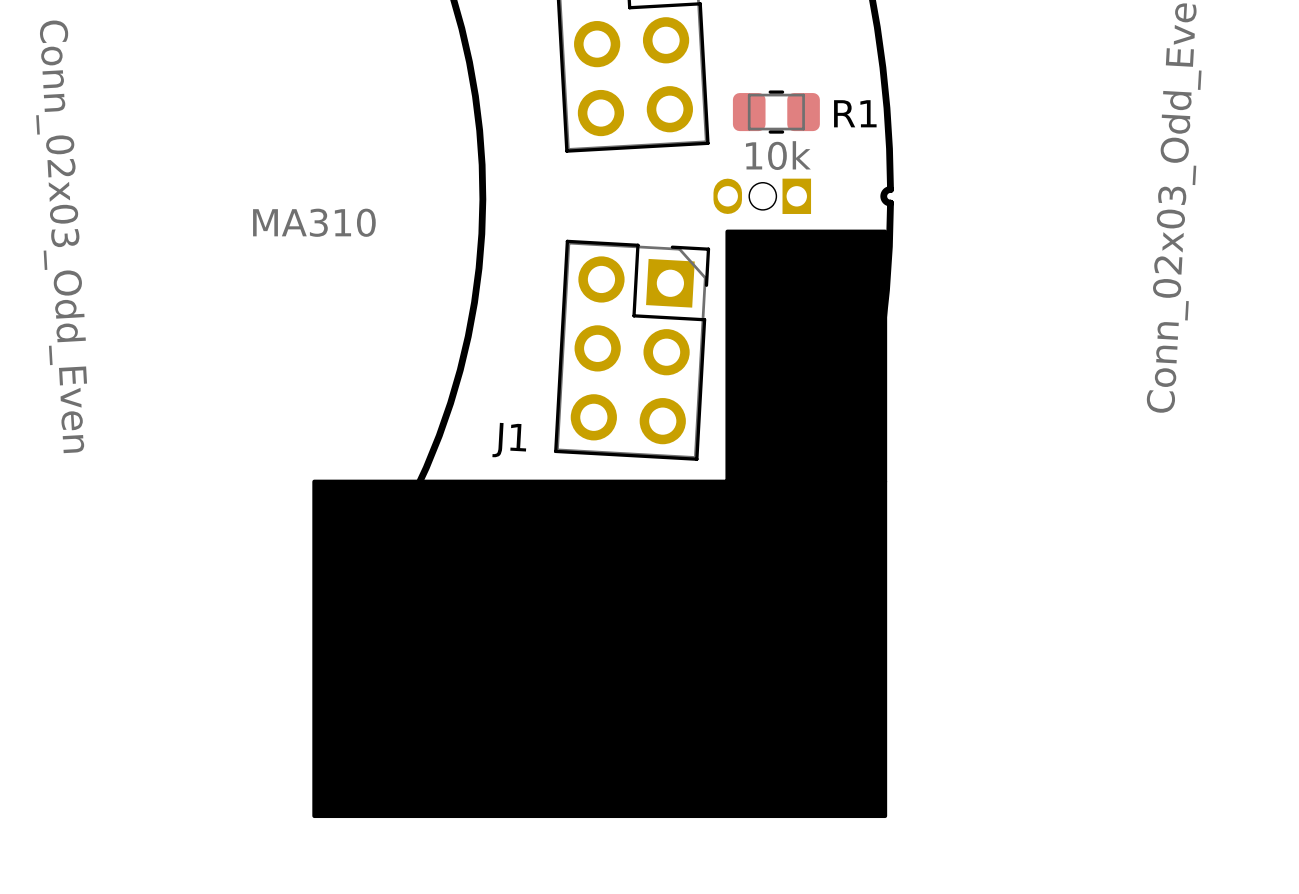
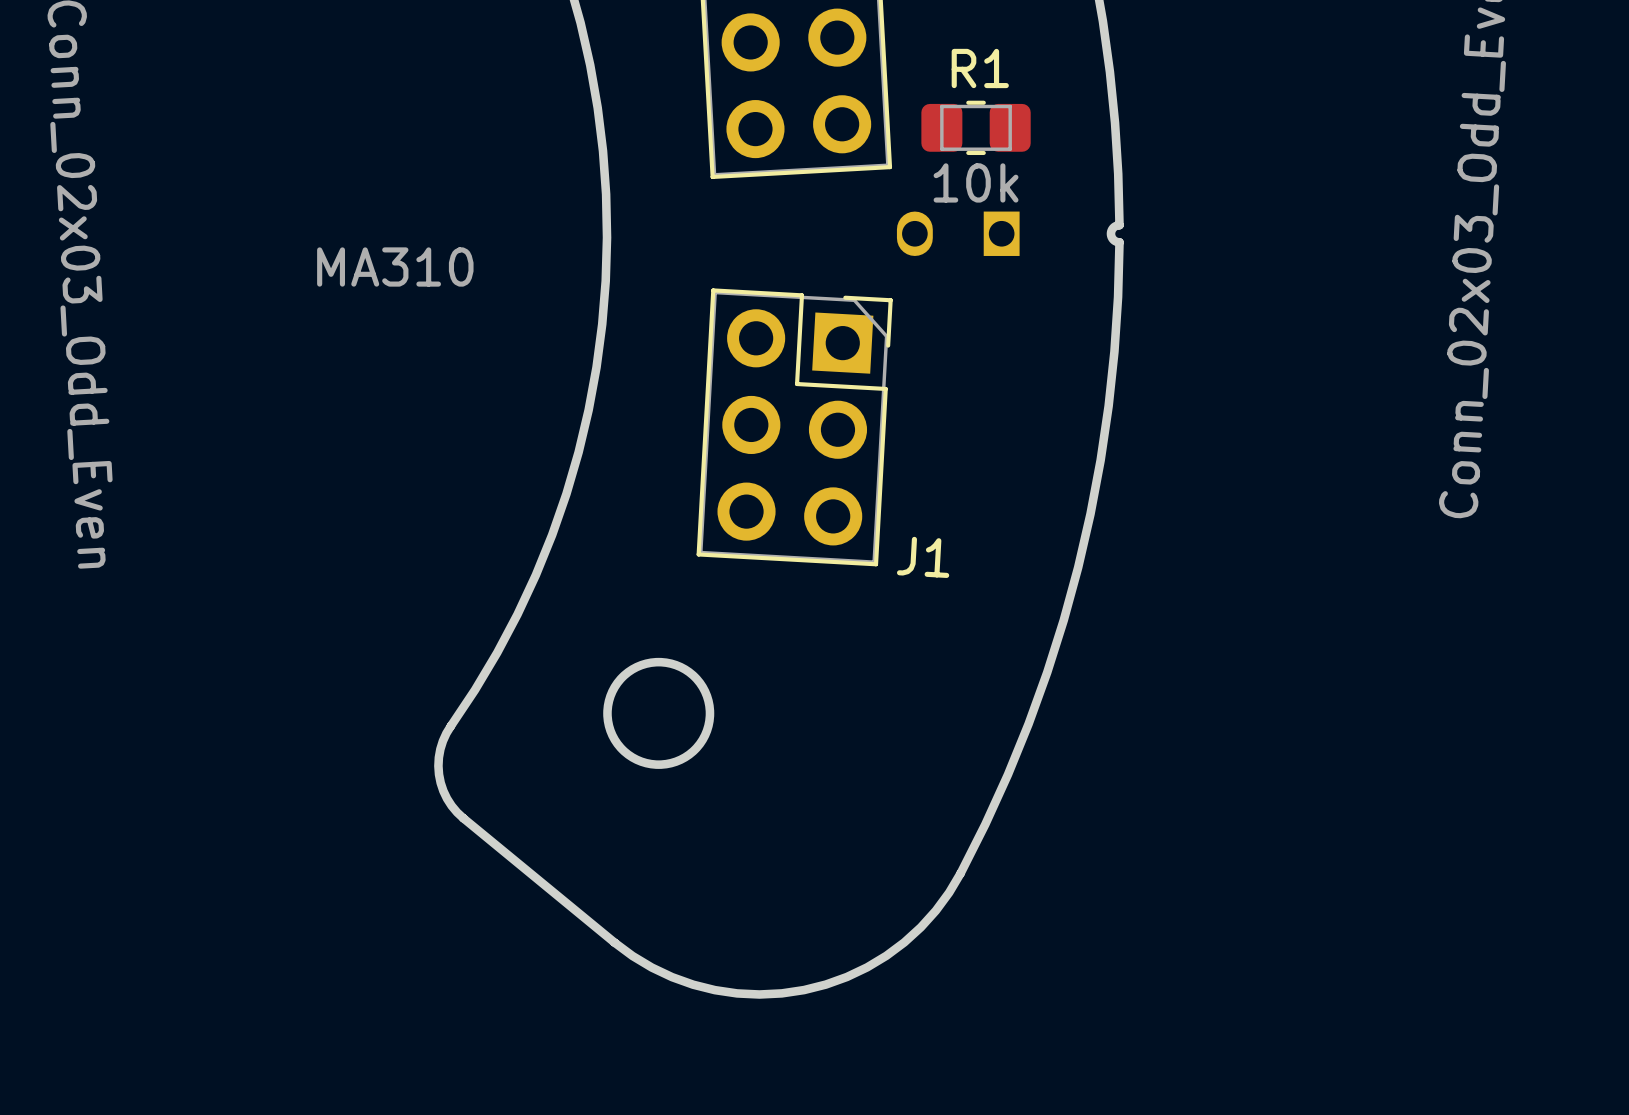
R1 name position: R1 (855, 113) -> R1 (980, 68)
round board edge: [749, 182, 777, 211] -> none
drawing: [312, 229, 888, 819] -> none
J1 name position: J1 (509, 440) -> J1 (923, 557)

